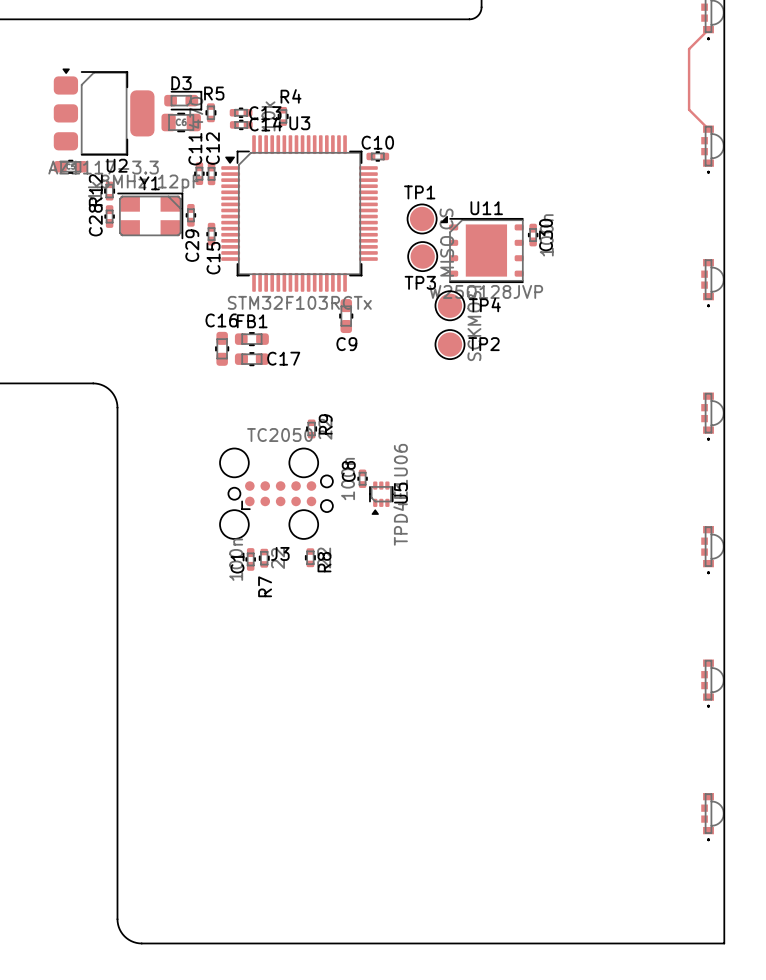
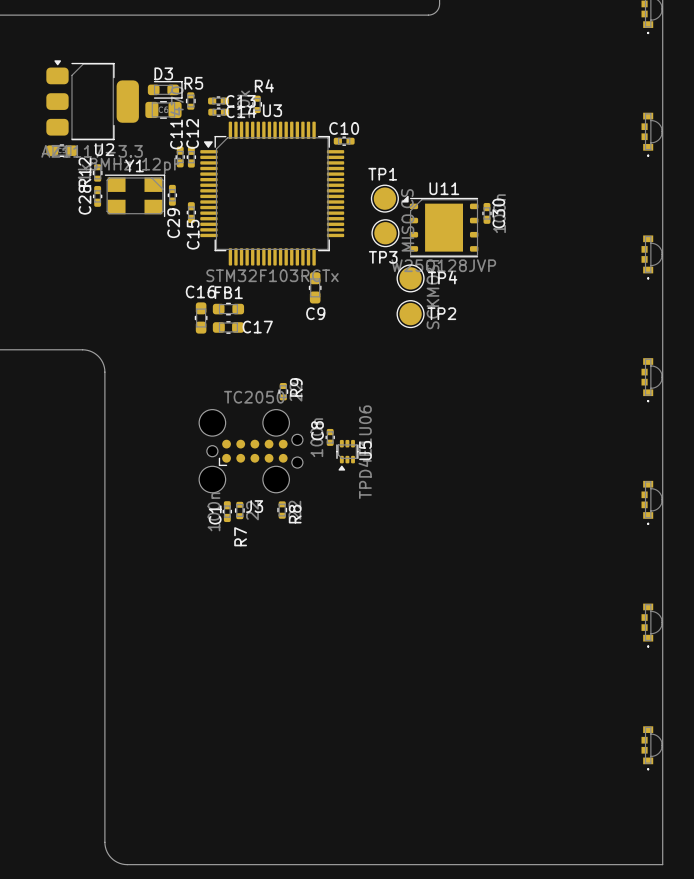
track: (708, 29) (689, 49) (689, 109) (708, 129) -> none

